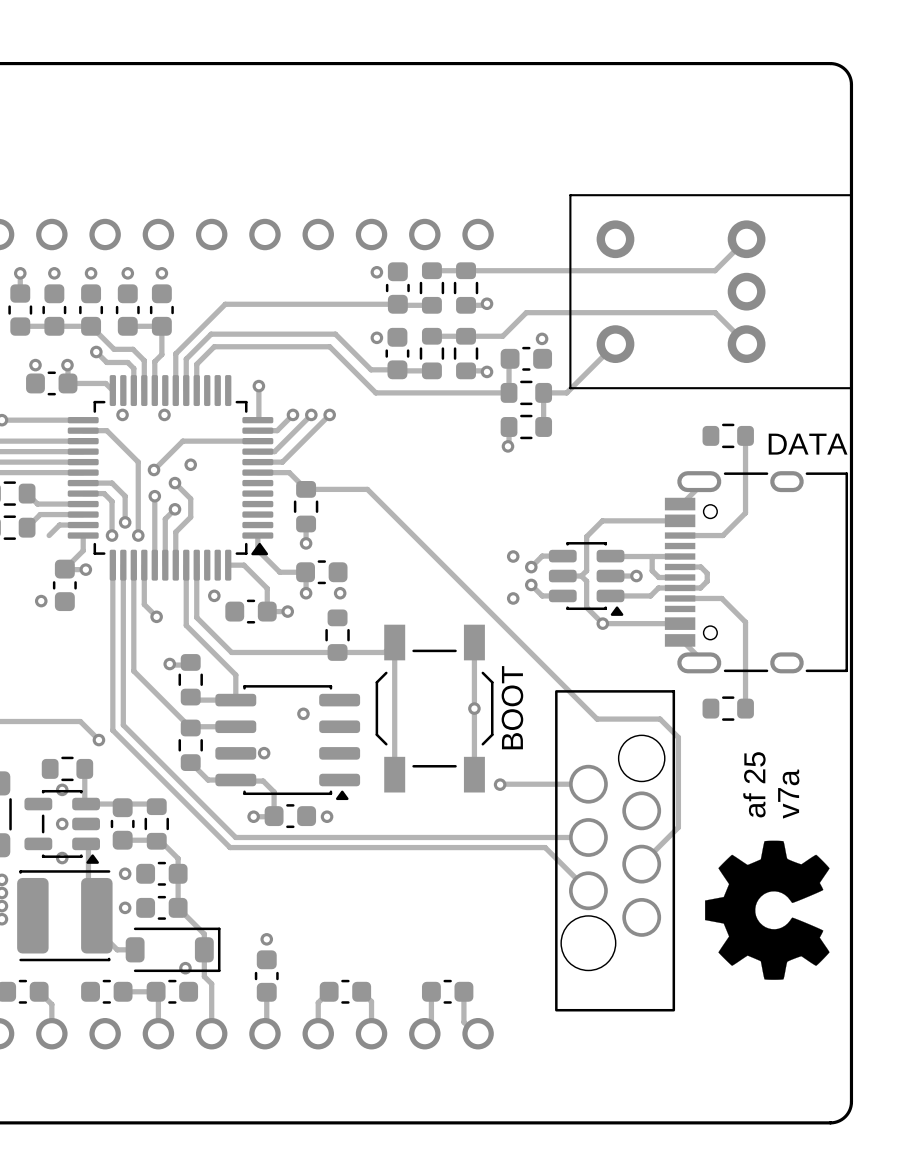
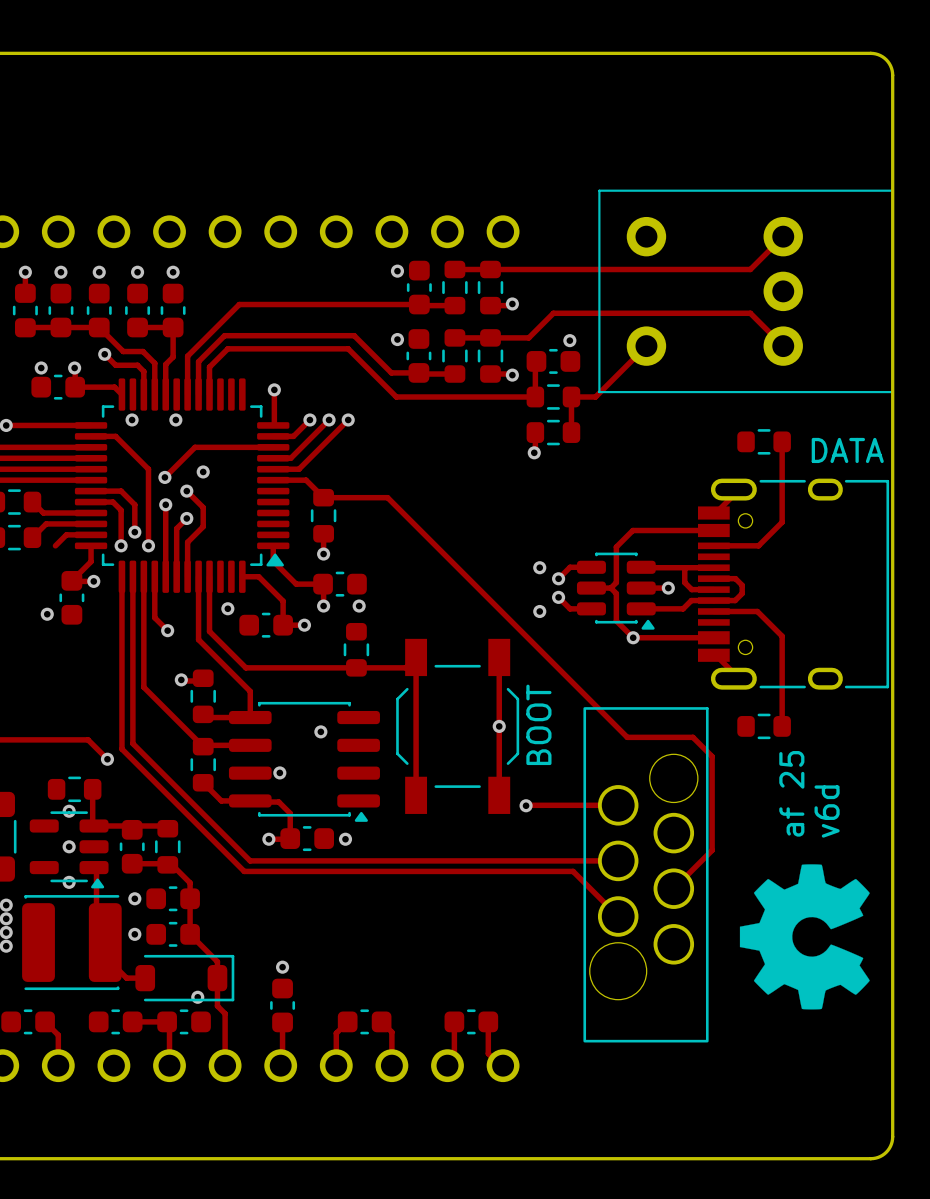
part footprint: [24, 789, 100, 864] -> [29, 811, 109, 889]
text: v7a (788, 794) -> v6d (827, 811)

